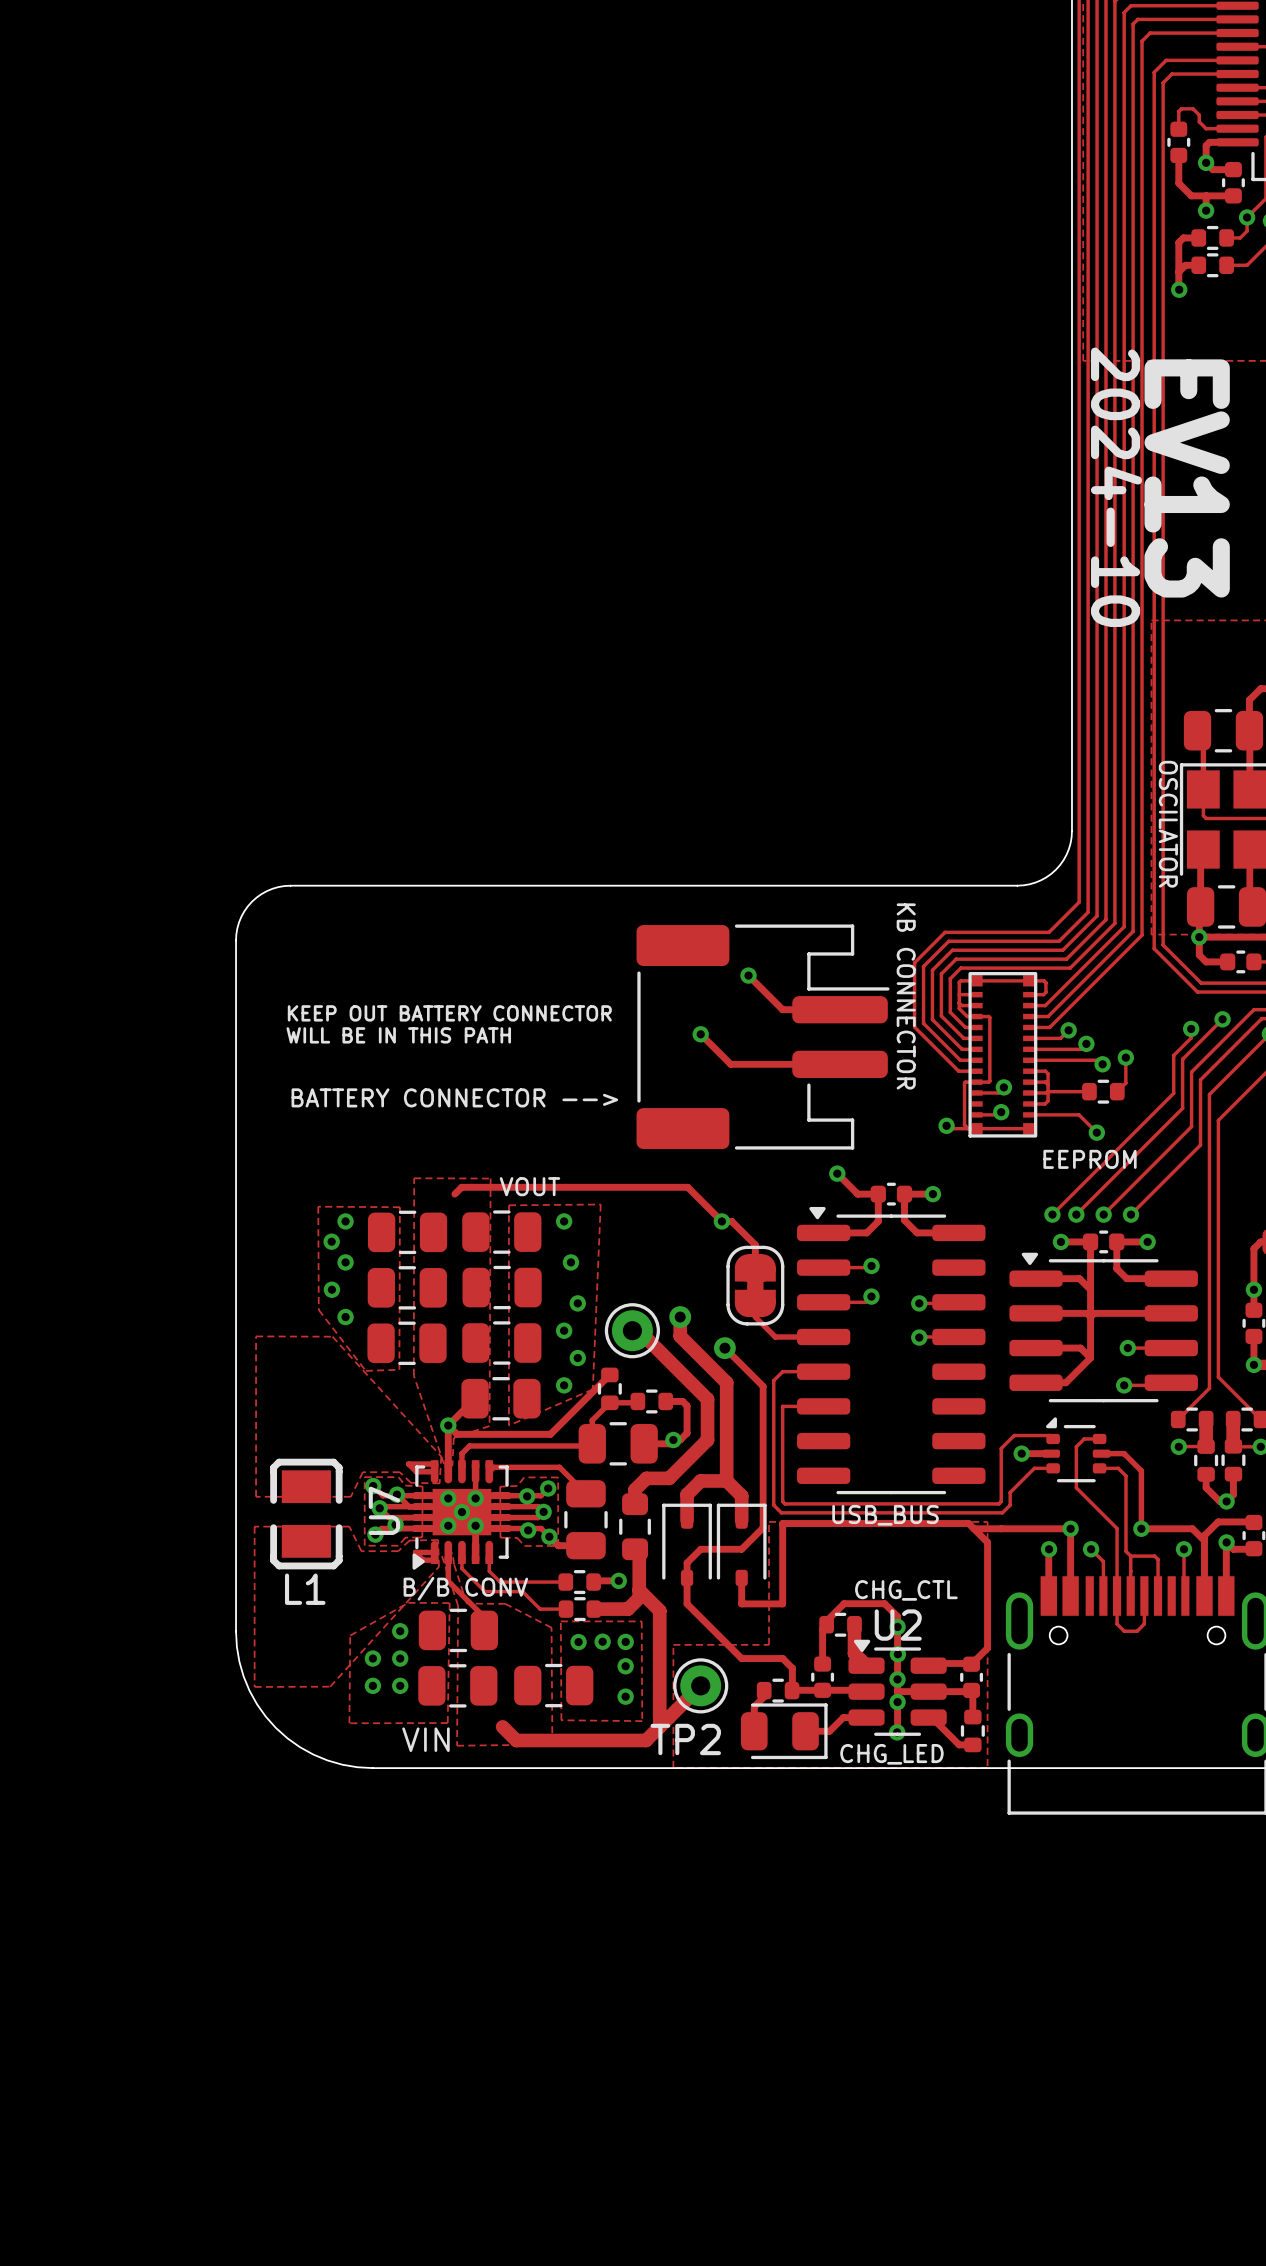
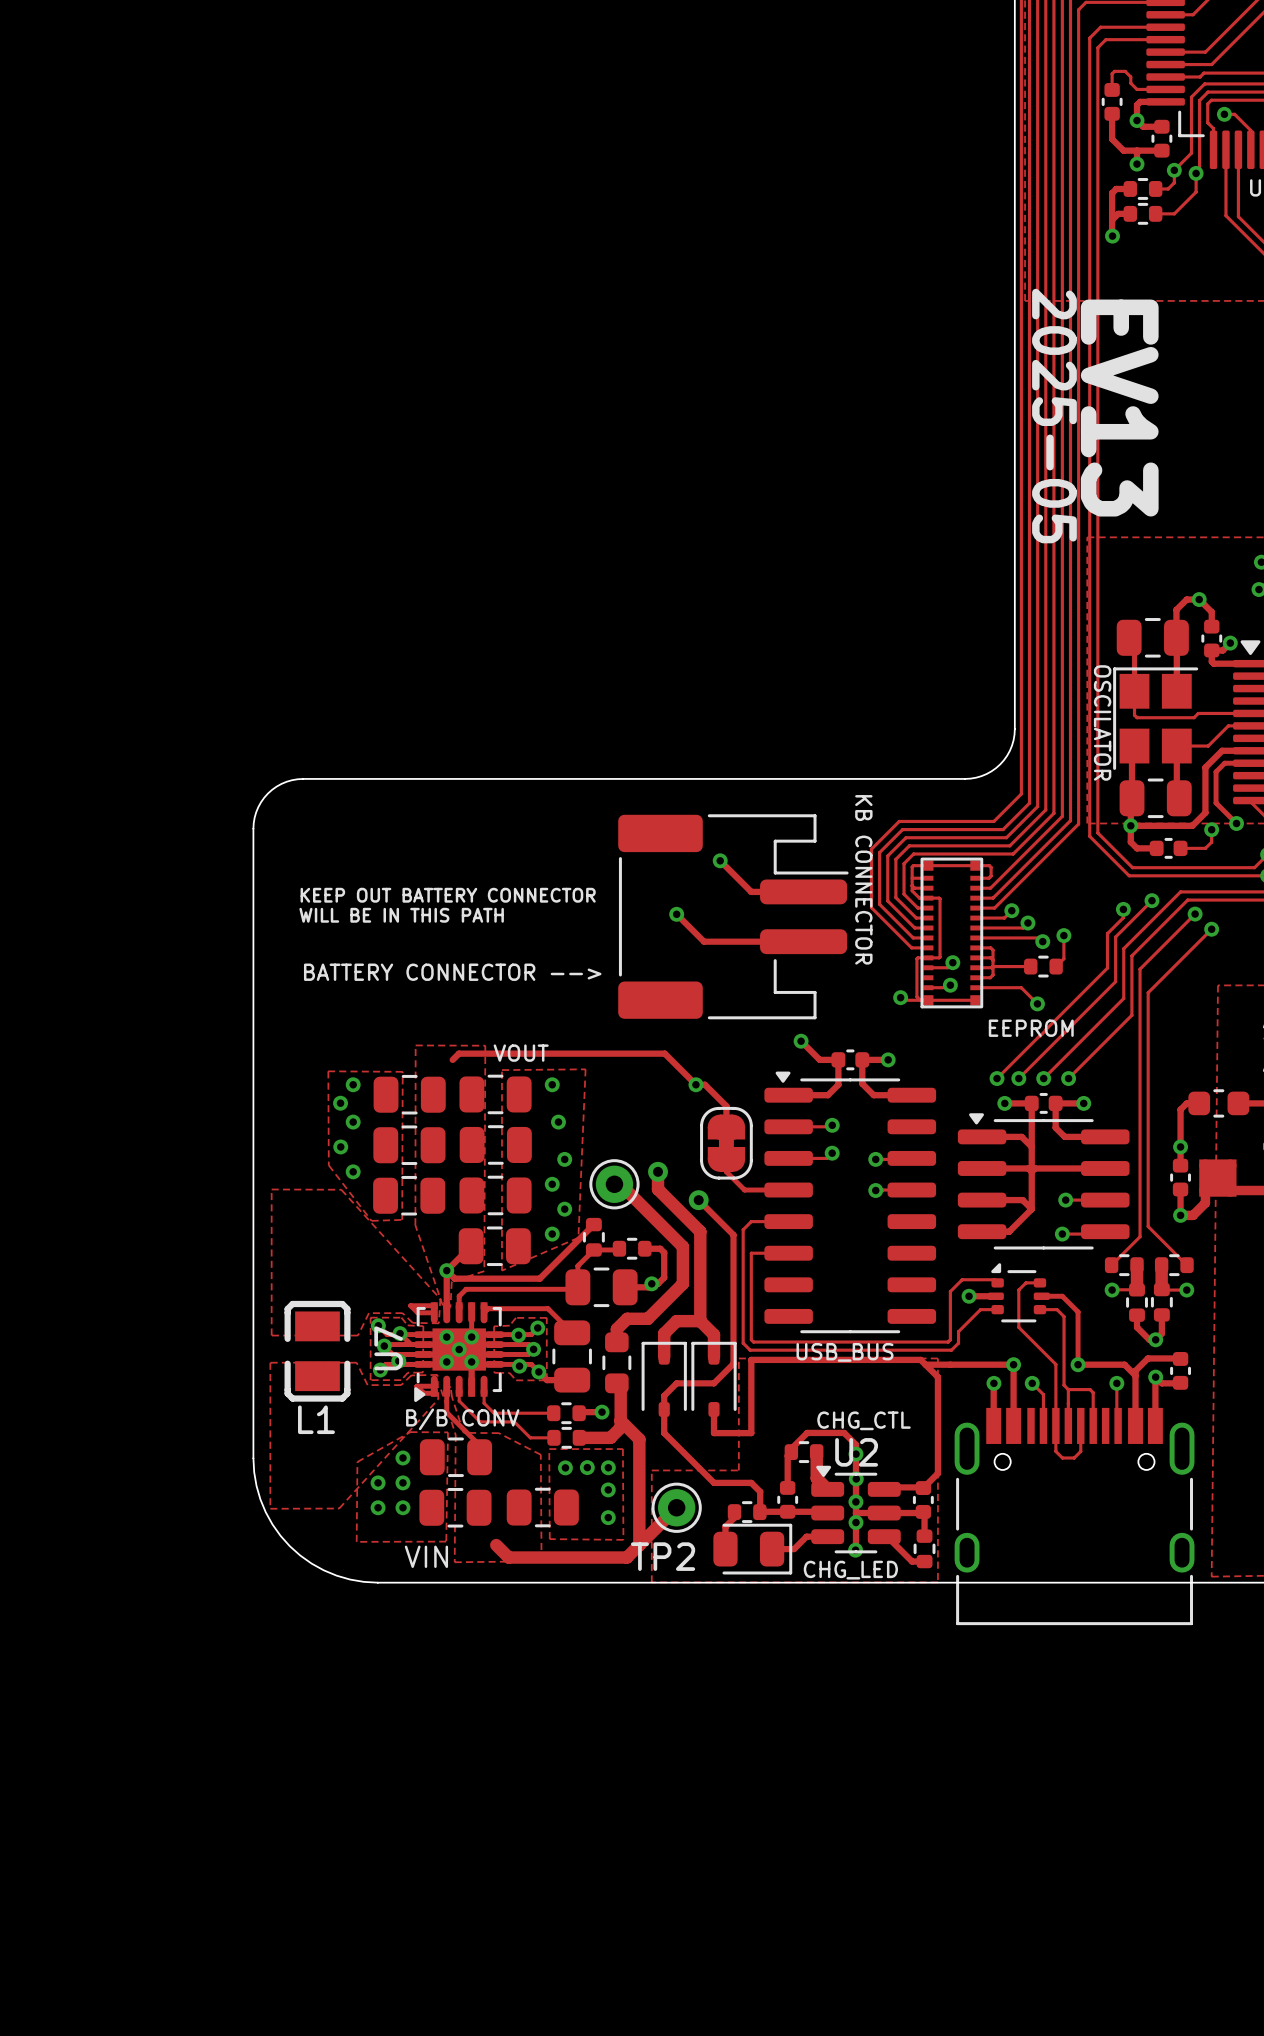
text: 2024-10 (1116, 487) -> 2025-05 (1054, 416)

